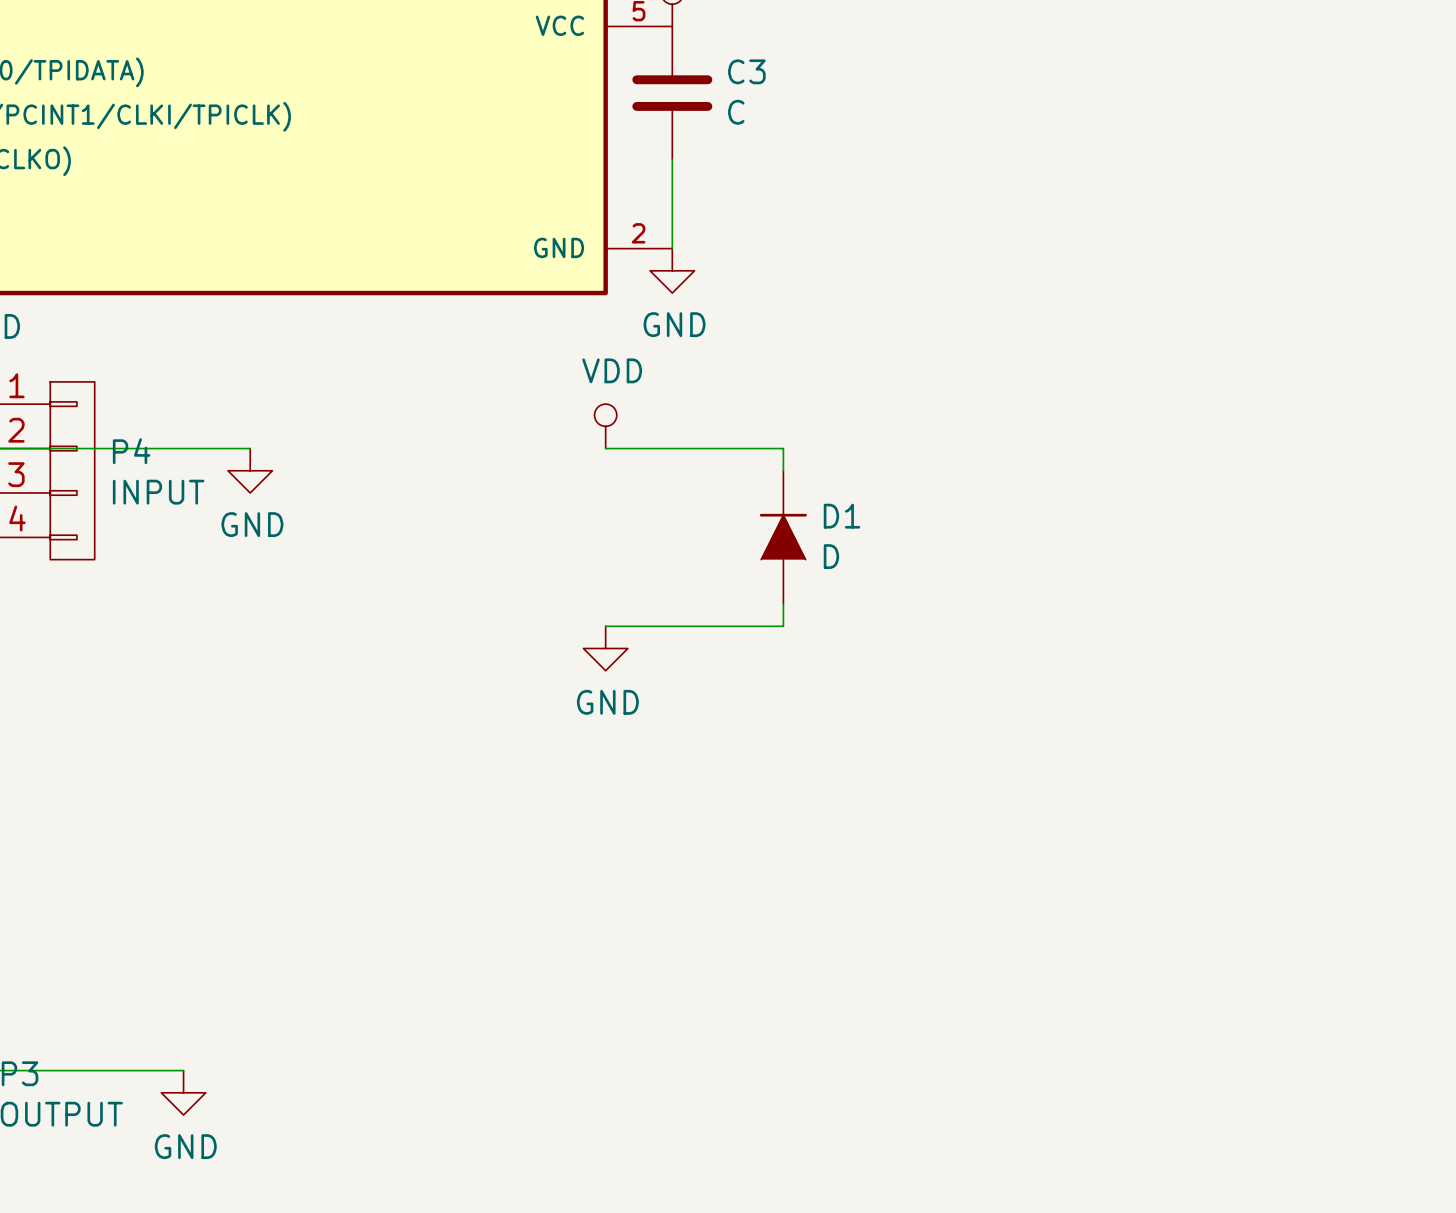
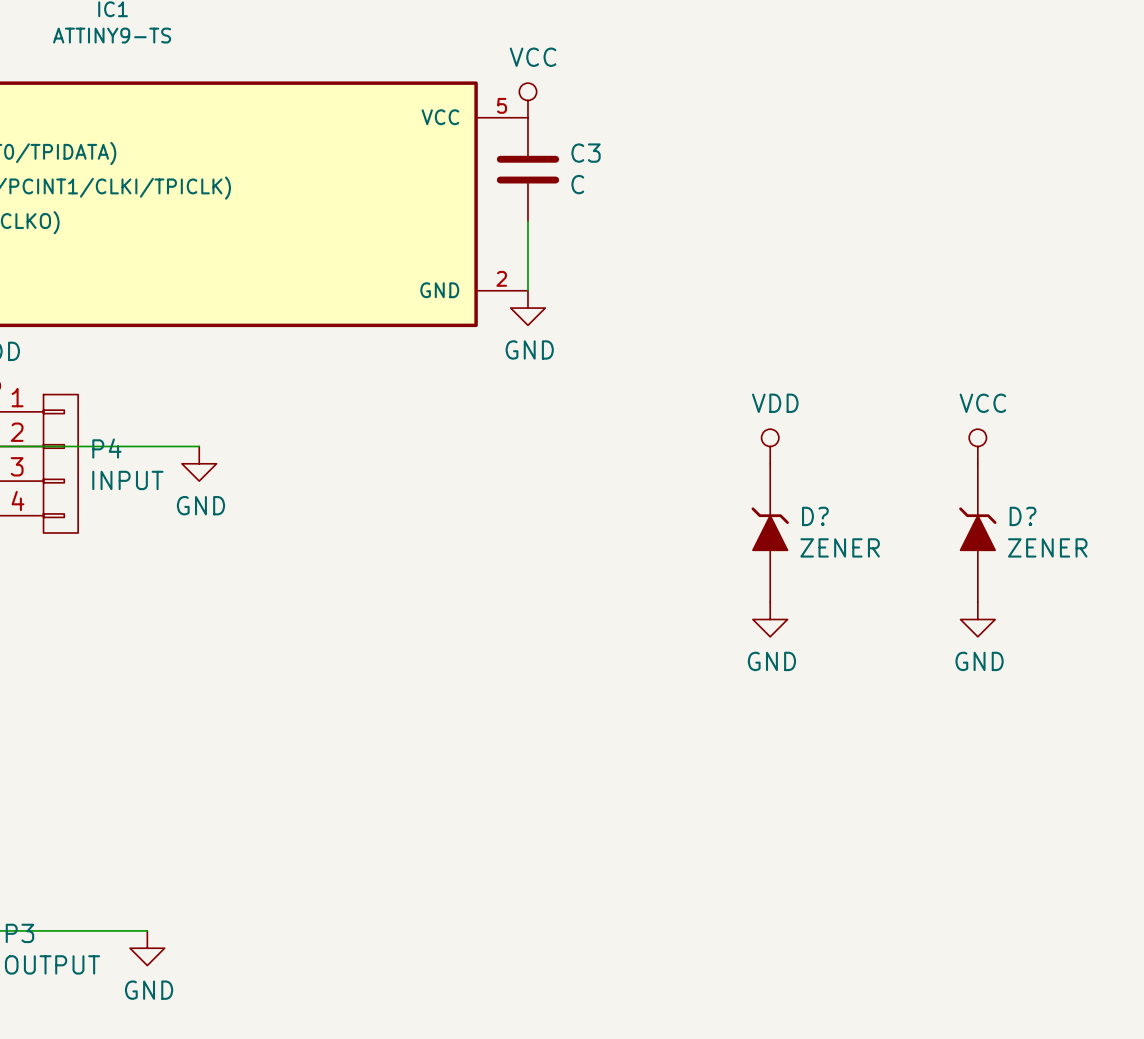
power symbol position: VDD (605, 426) -> VDD (770, 446)
wire: (605, 448) (783, 448) (783, 470) -> none
power symbol: none -> VCC (977, 446)
D1: D (783, 537) -> none
D?: none -> ZENER (770, 532)
D?: none -> ZENER (977, 532)
wire: (783, 604) (783, 626) (605, 626) -> none
power symbol: GND (605, 648) -> none
power symbol: none -> GND (770, 619)
power symbol: none -> GND (977, 619)

